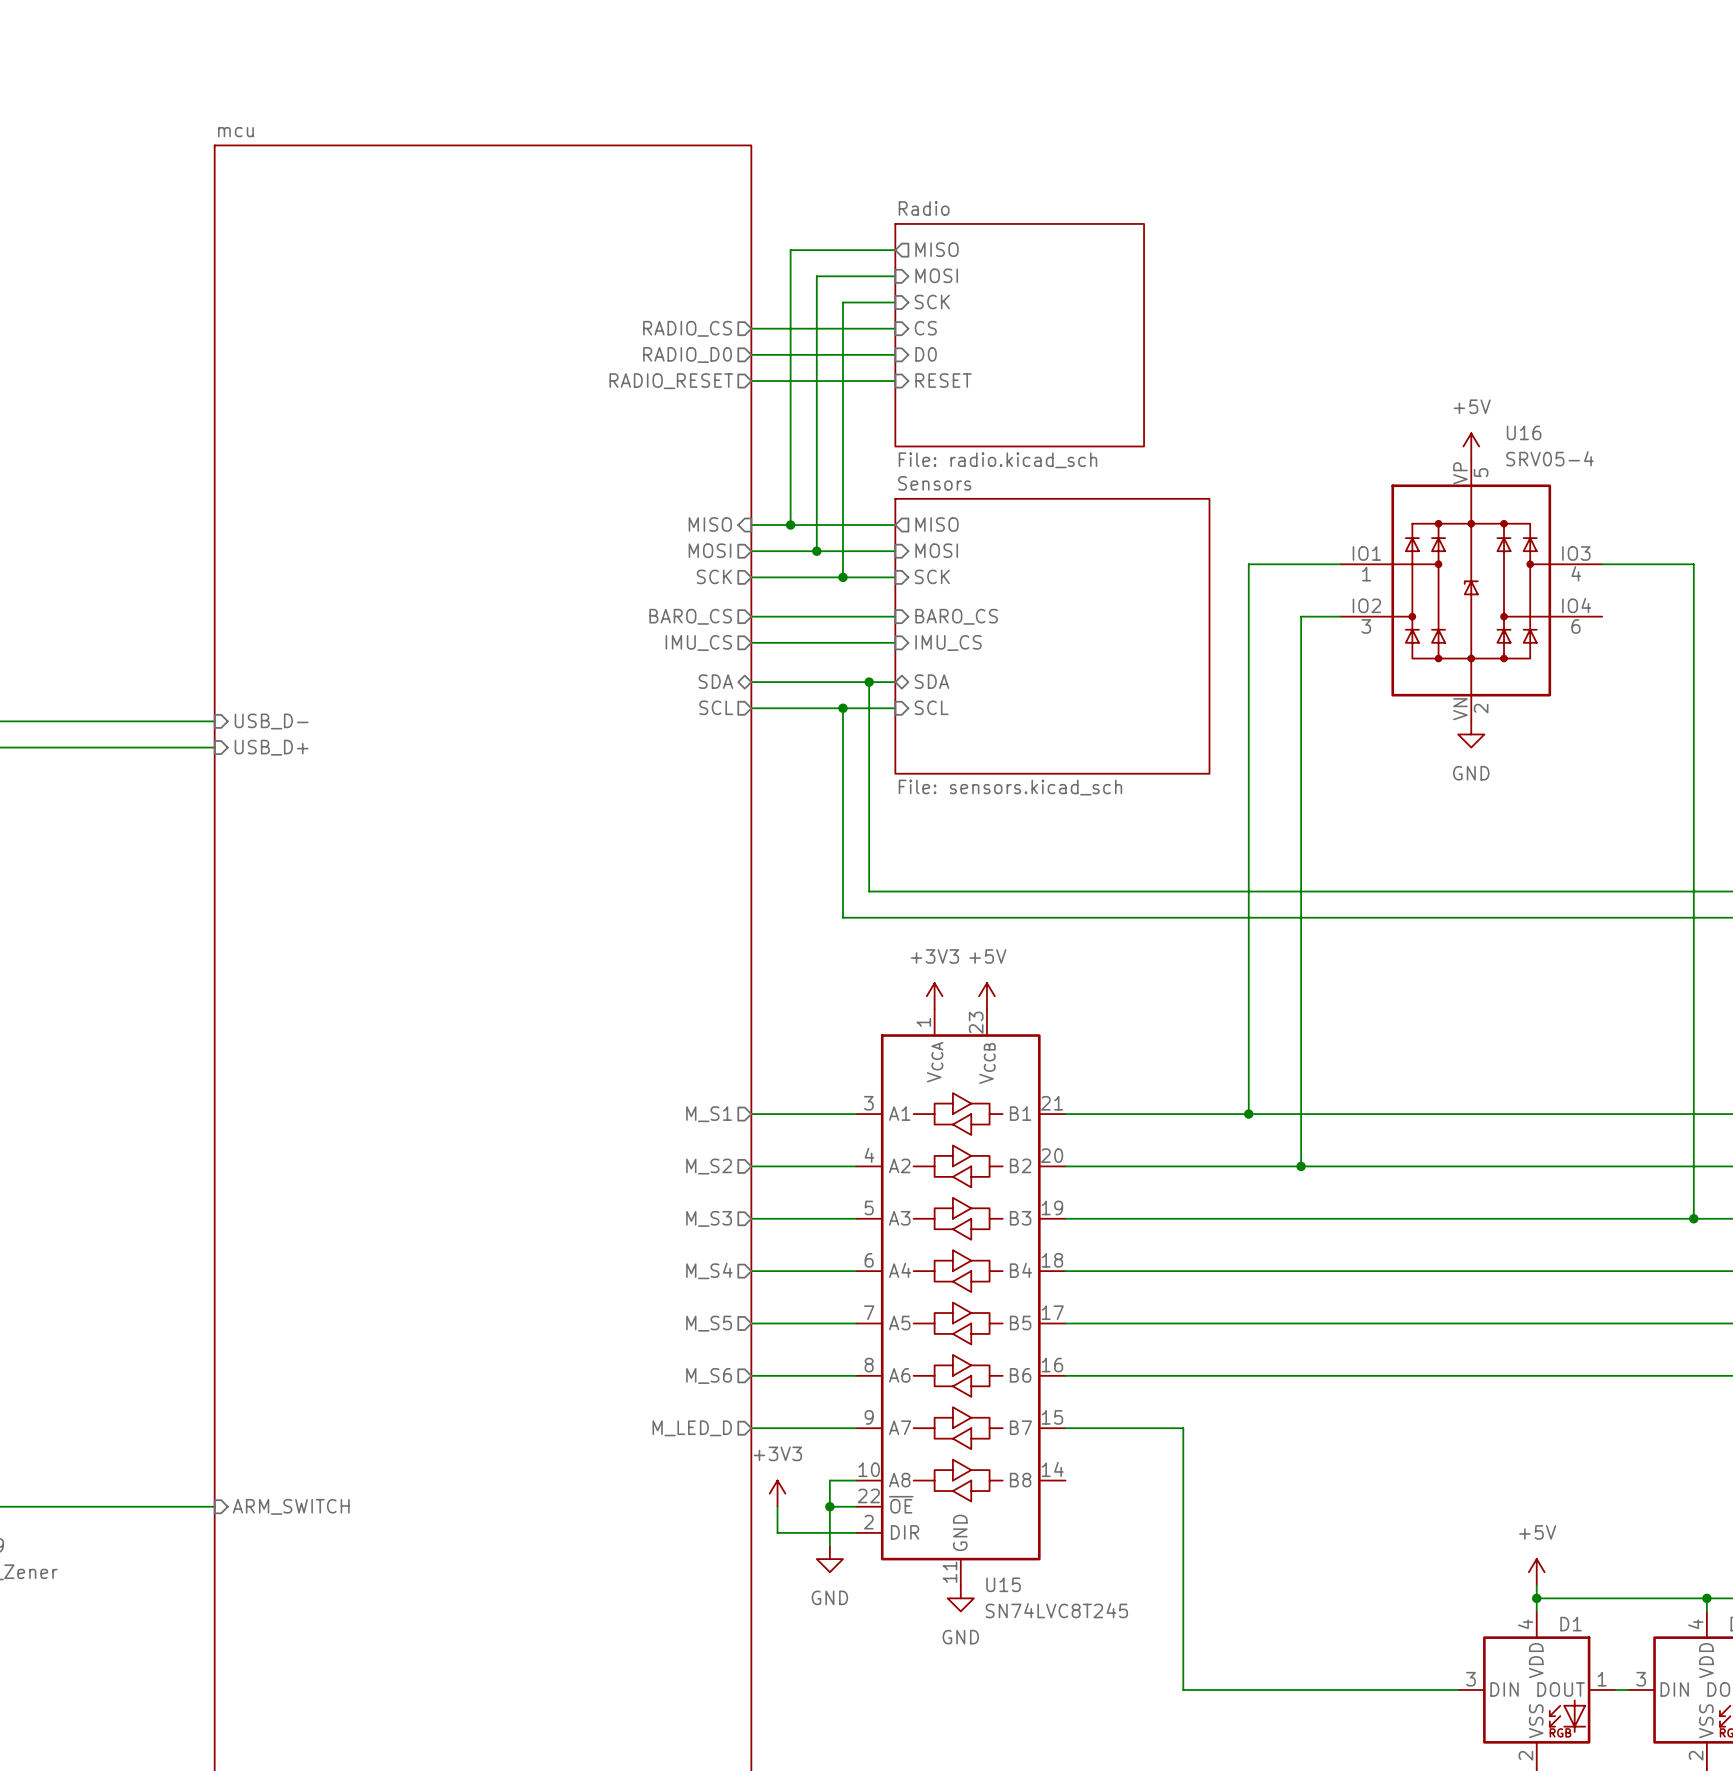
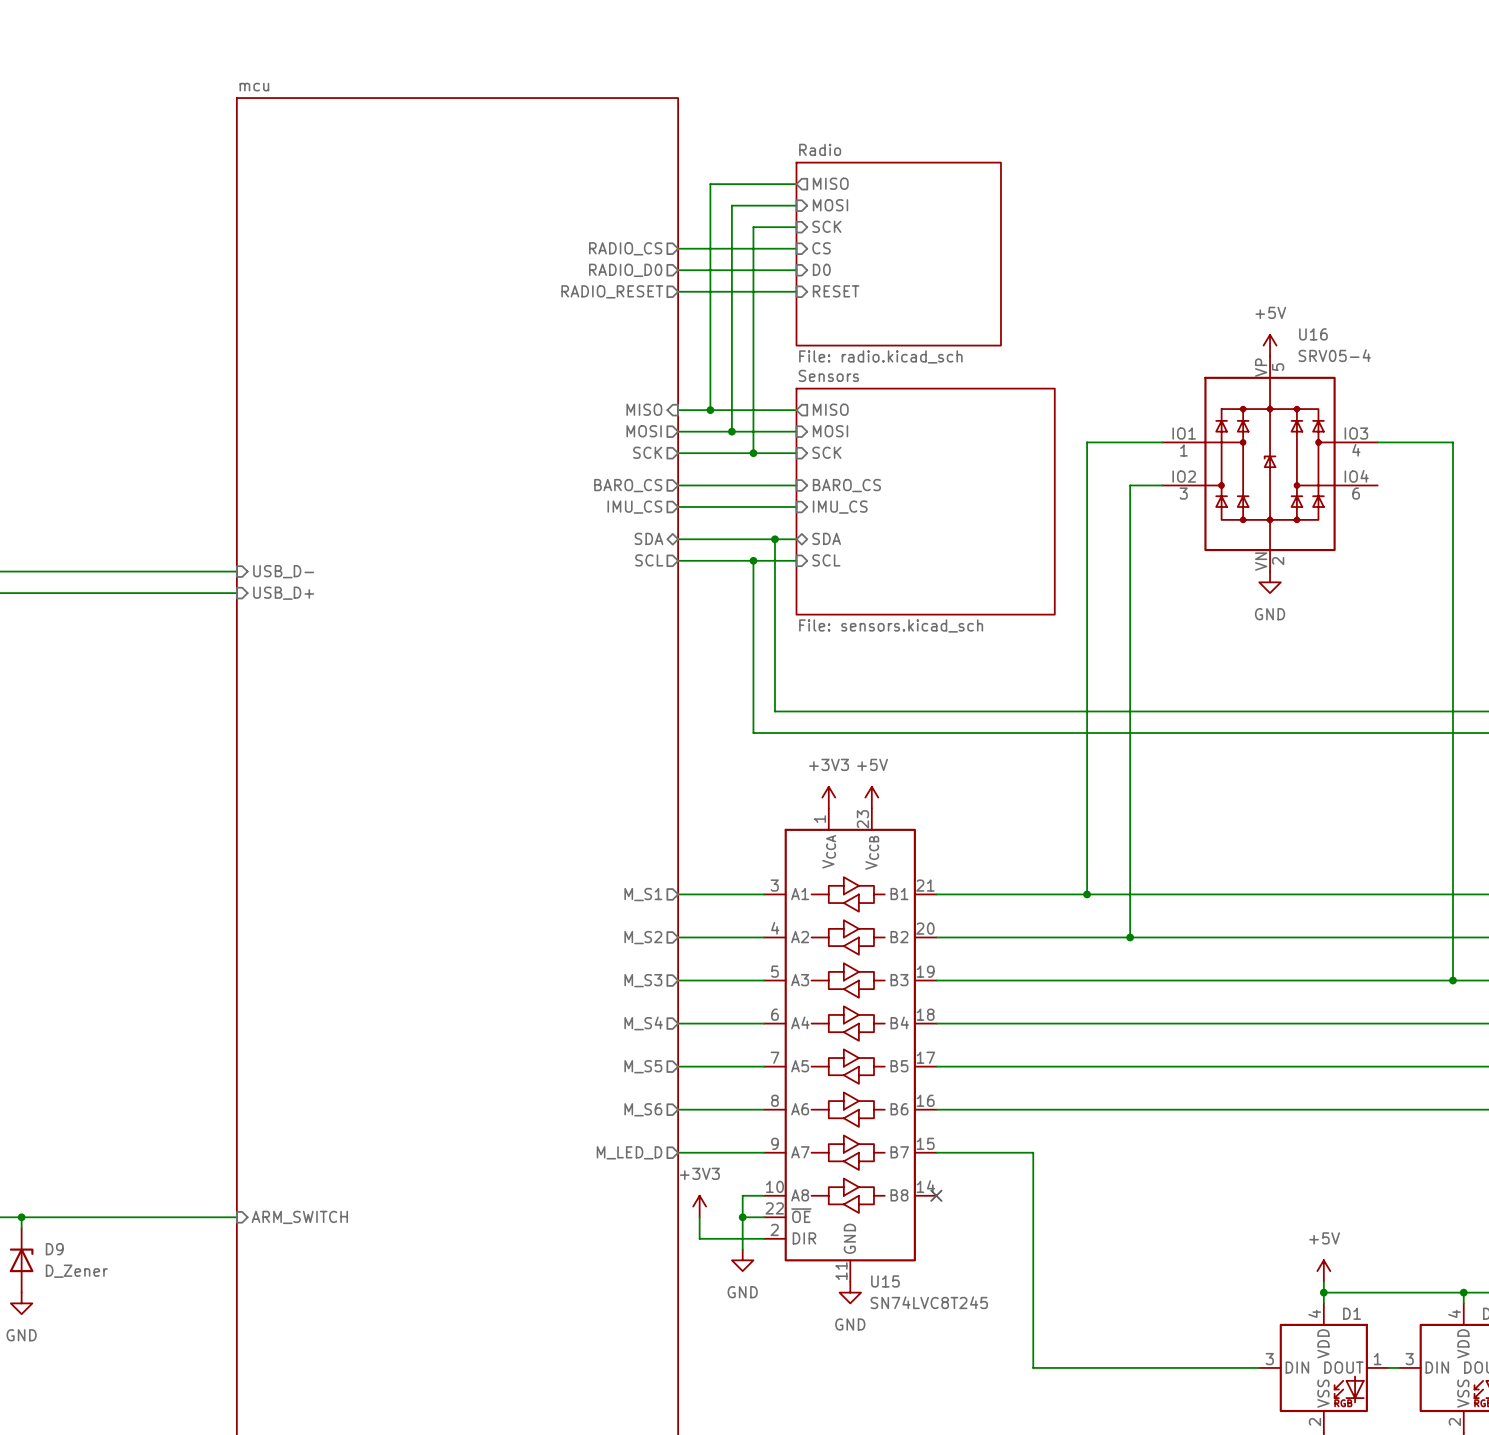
no-connect mark: none -> (936, 1195)

